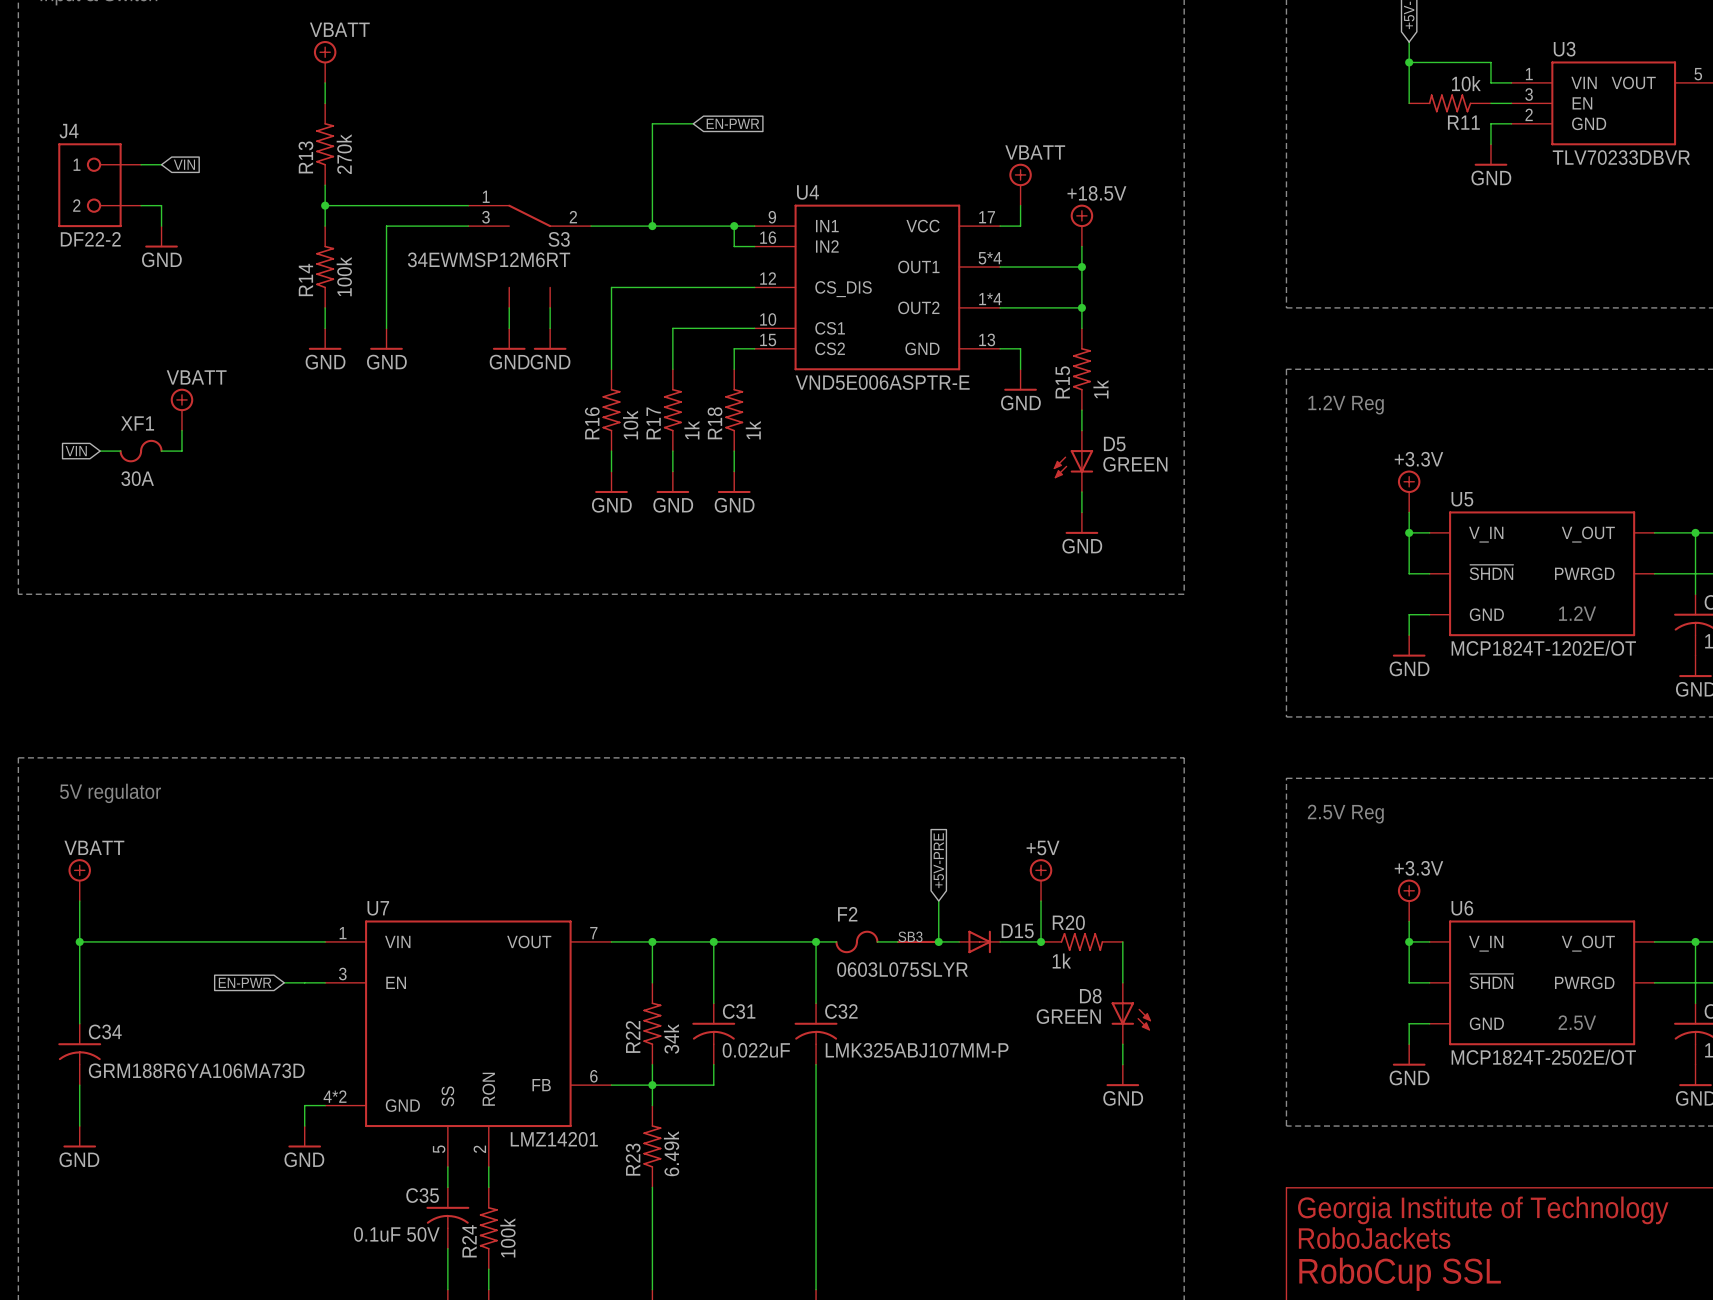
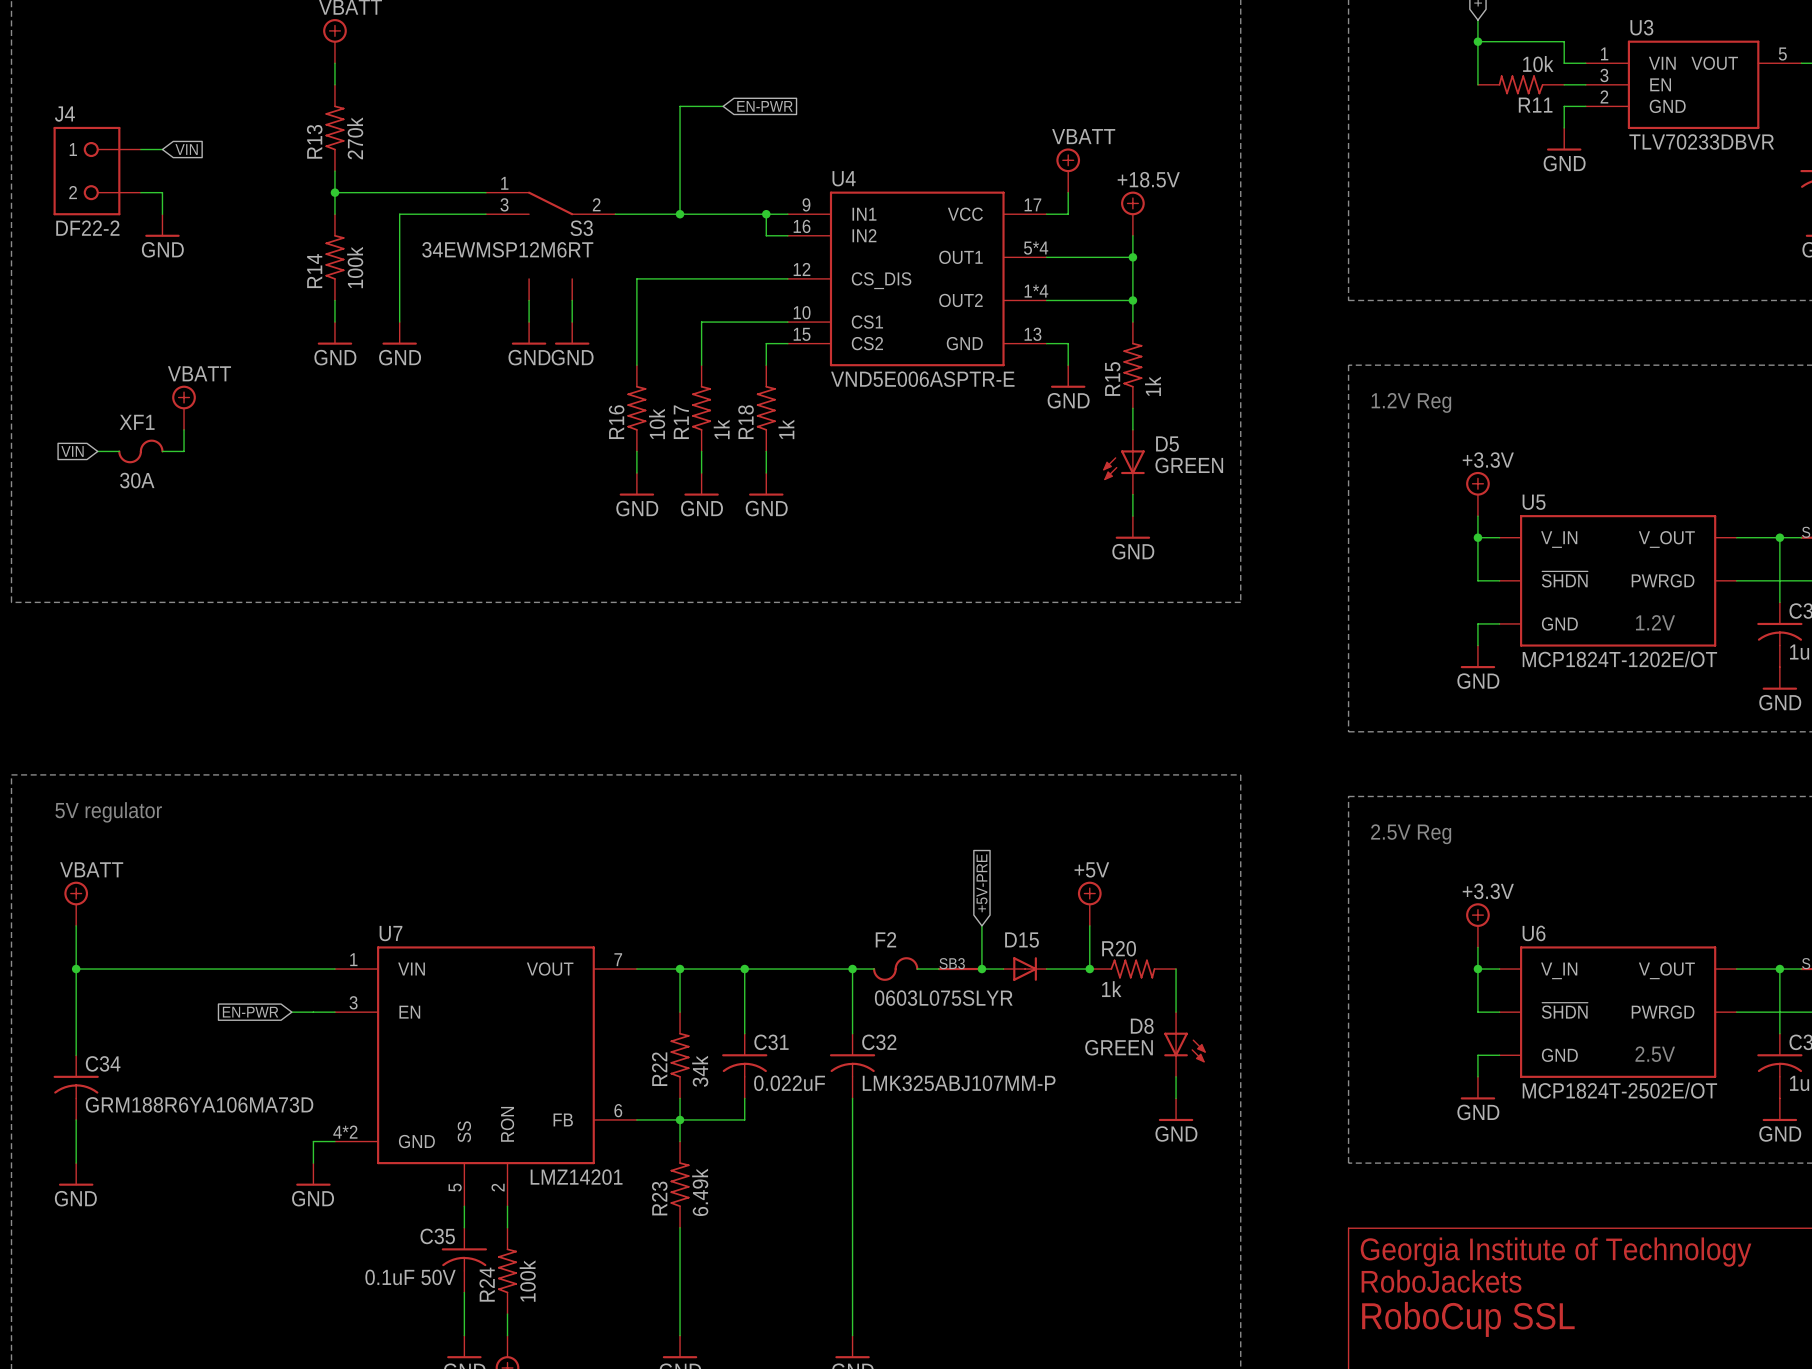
D15 name position: D15 (1017, 931) -> D15 (1022, 940)

